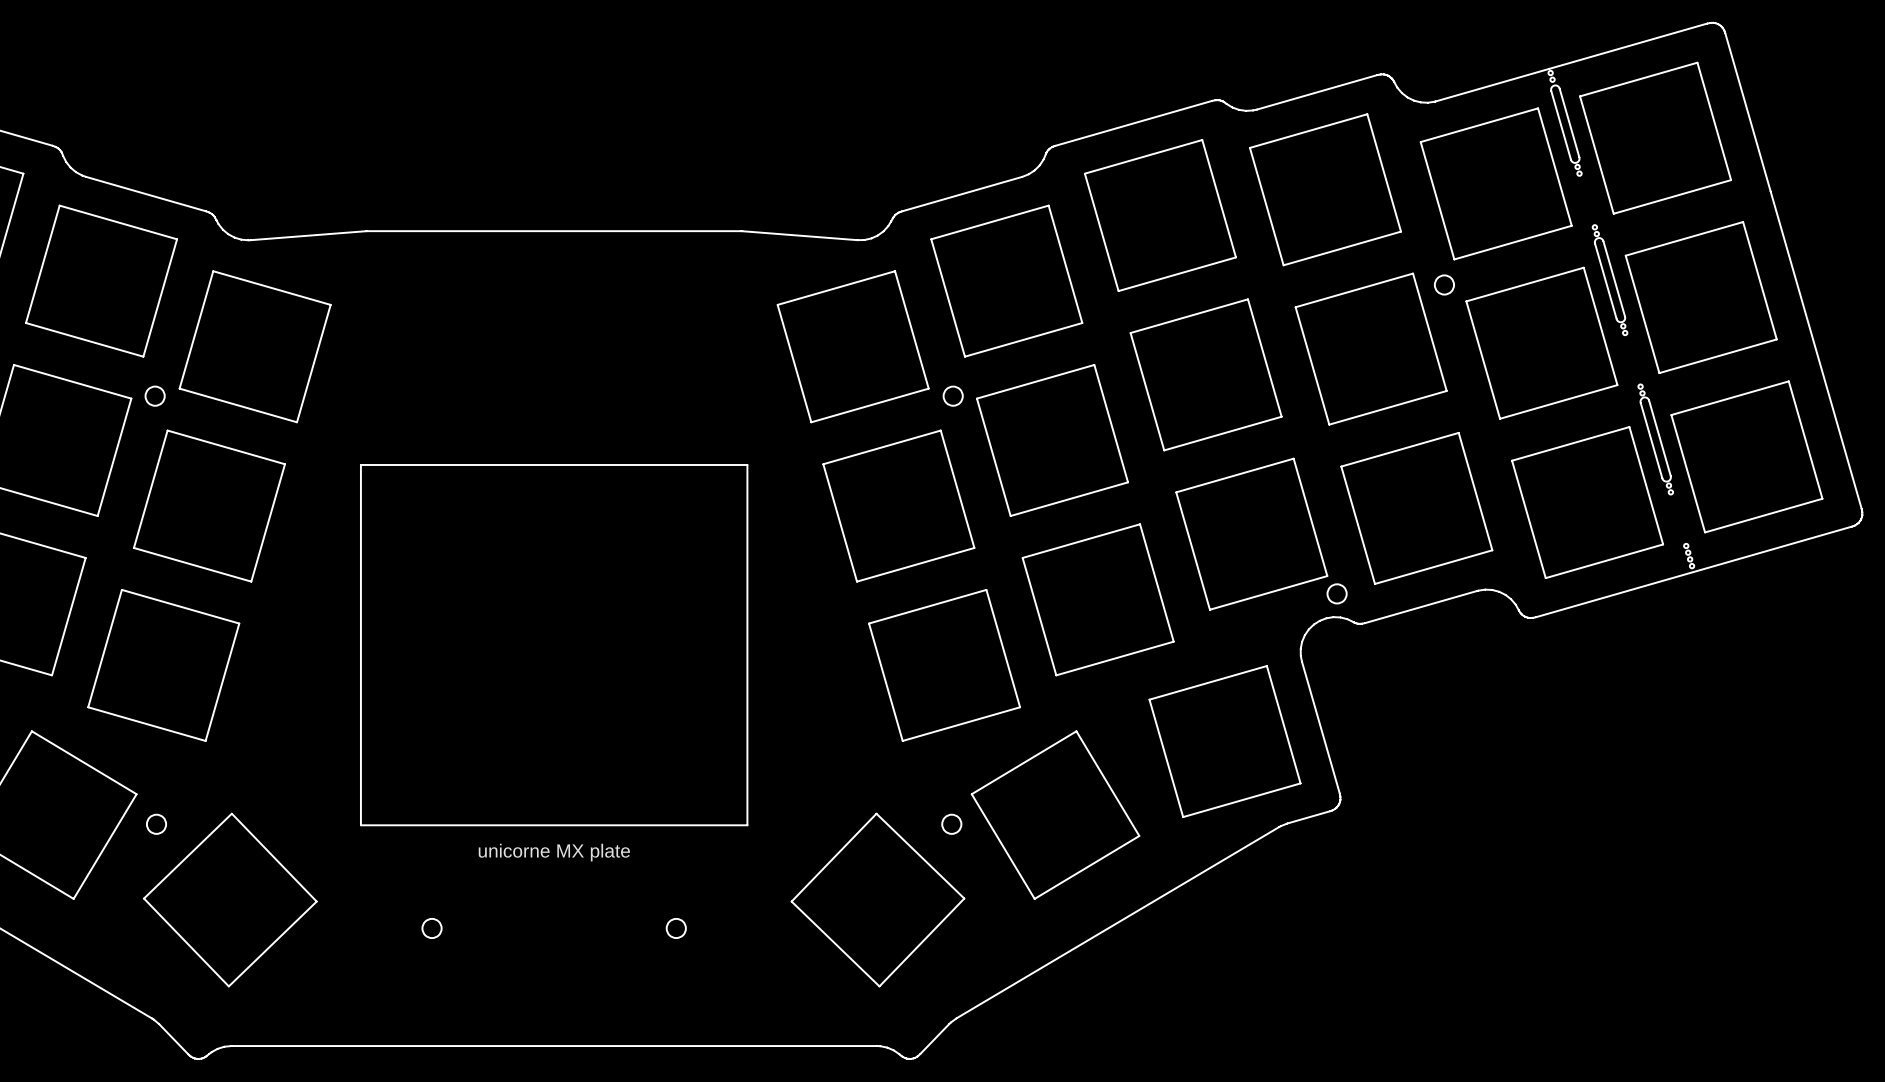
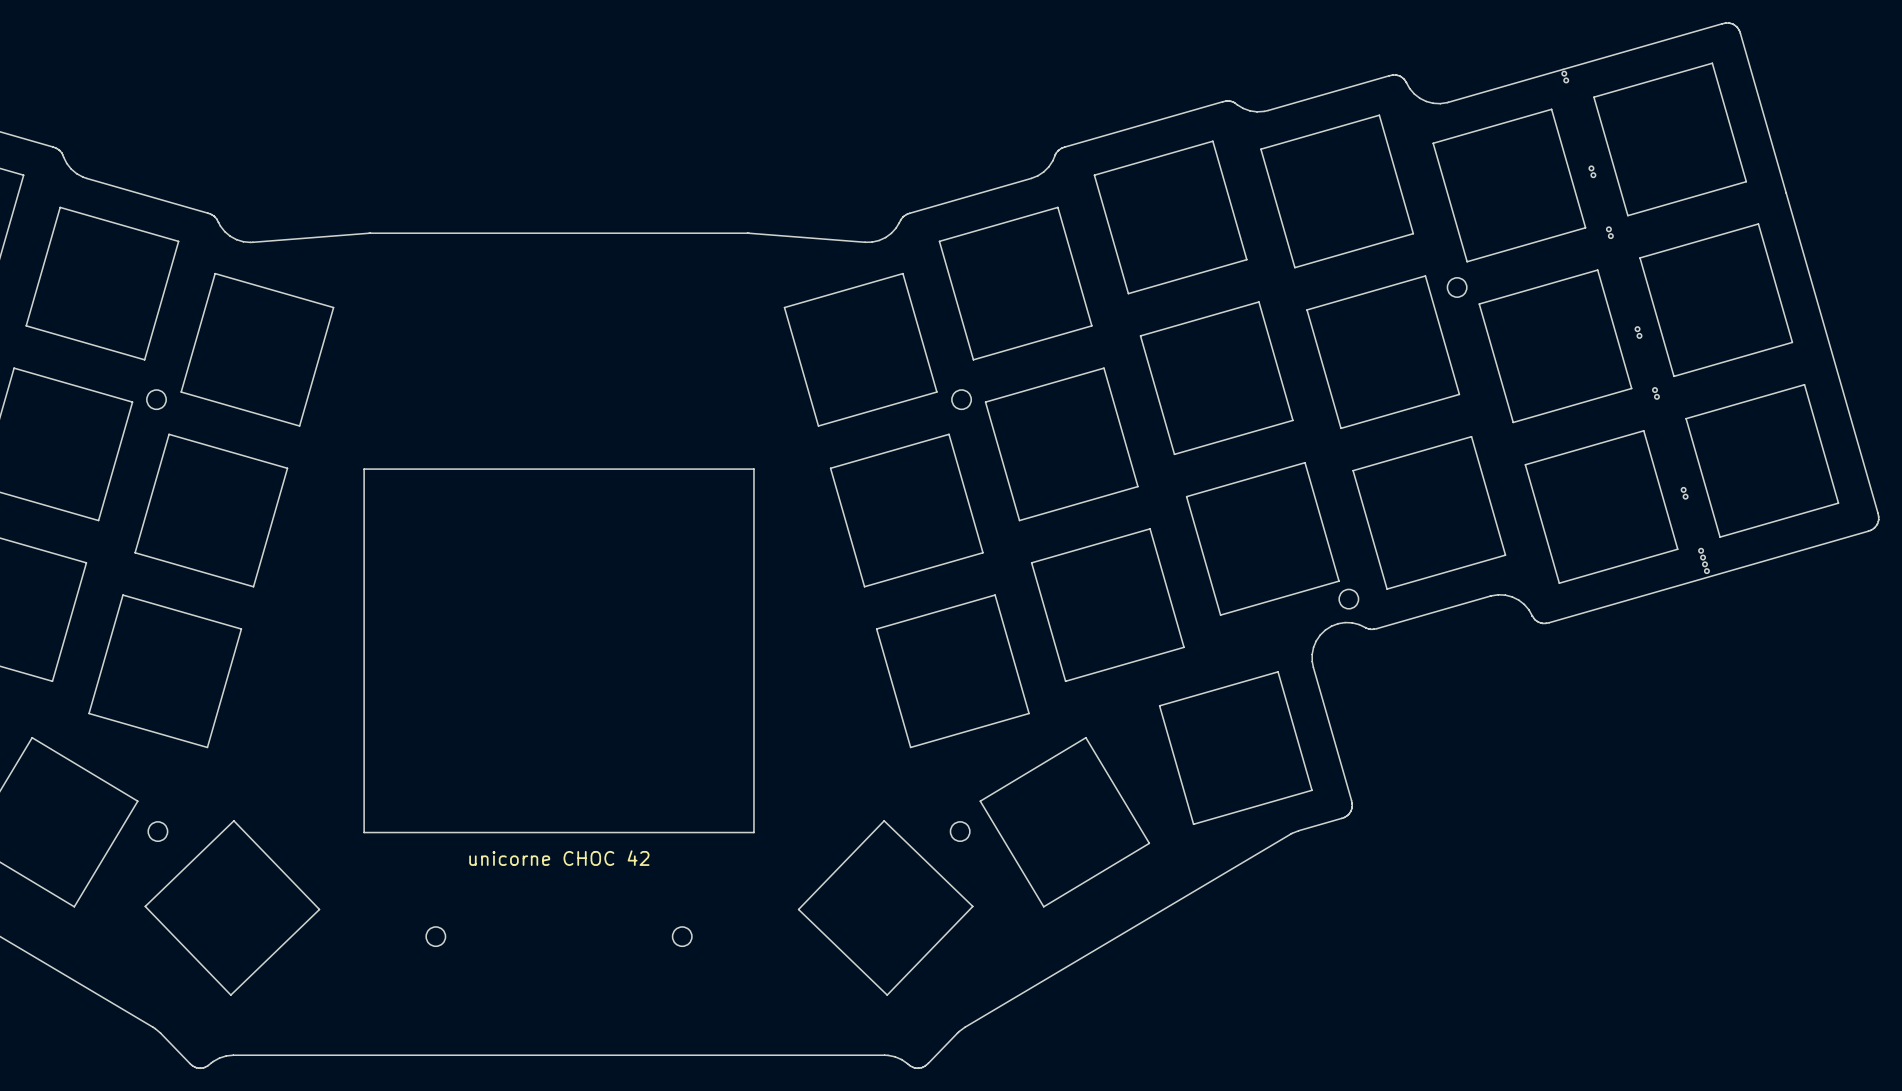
board edge: (1559, 88) (1579, 157) (1575, 162) (1570, 159) (1551, 91) (1554, 85) (1559, 88) -> none
board edge: (1603, 241) (1625, 316) (1622, 322) (1616, 319) (1595, 243) (1598, 238) (1603, 241) -> none
board edge: (1649, 400) (1670, 476) (1667, 481) (1662, 478) (1640, 402) (1643, 397) (1649, 400) -> none
text: unicorne MX plate (554, 852) -> unicorne CHOC 42 (559, 858)

